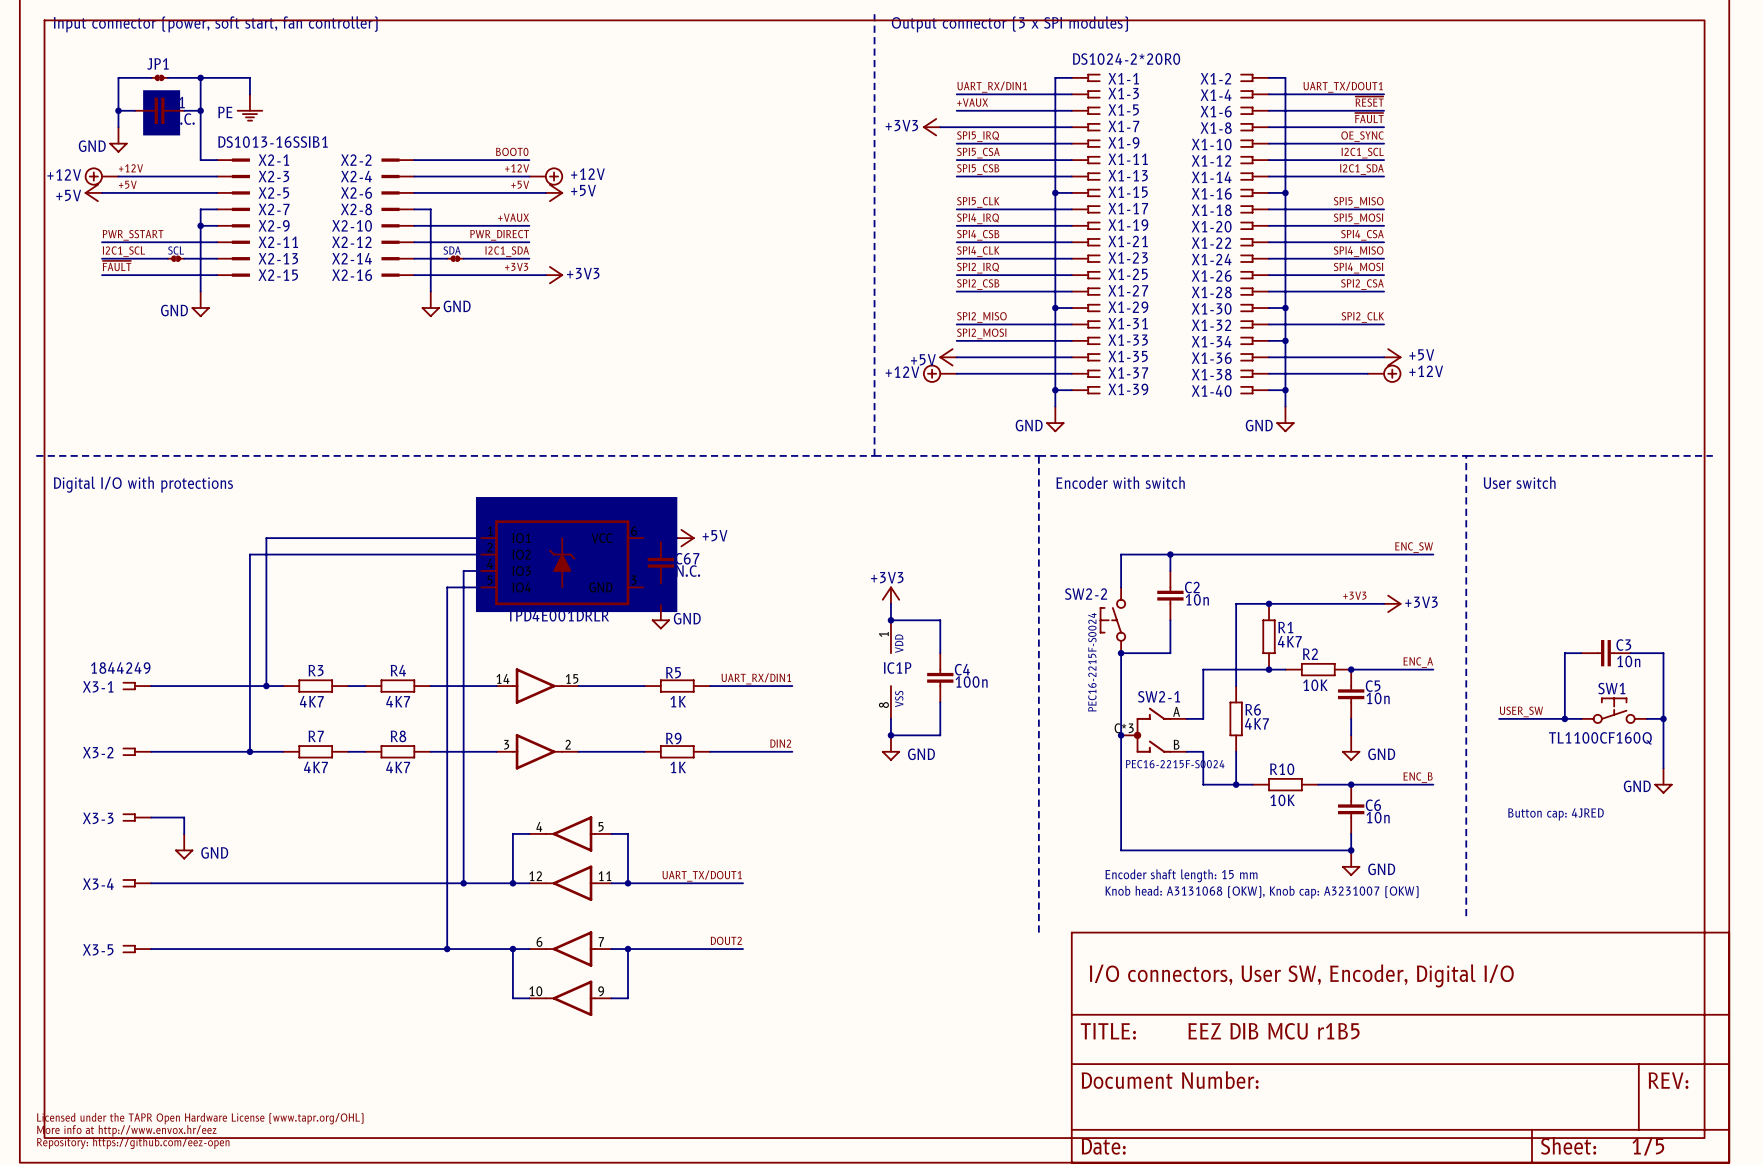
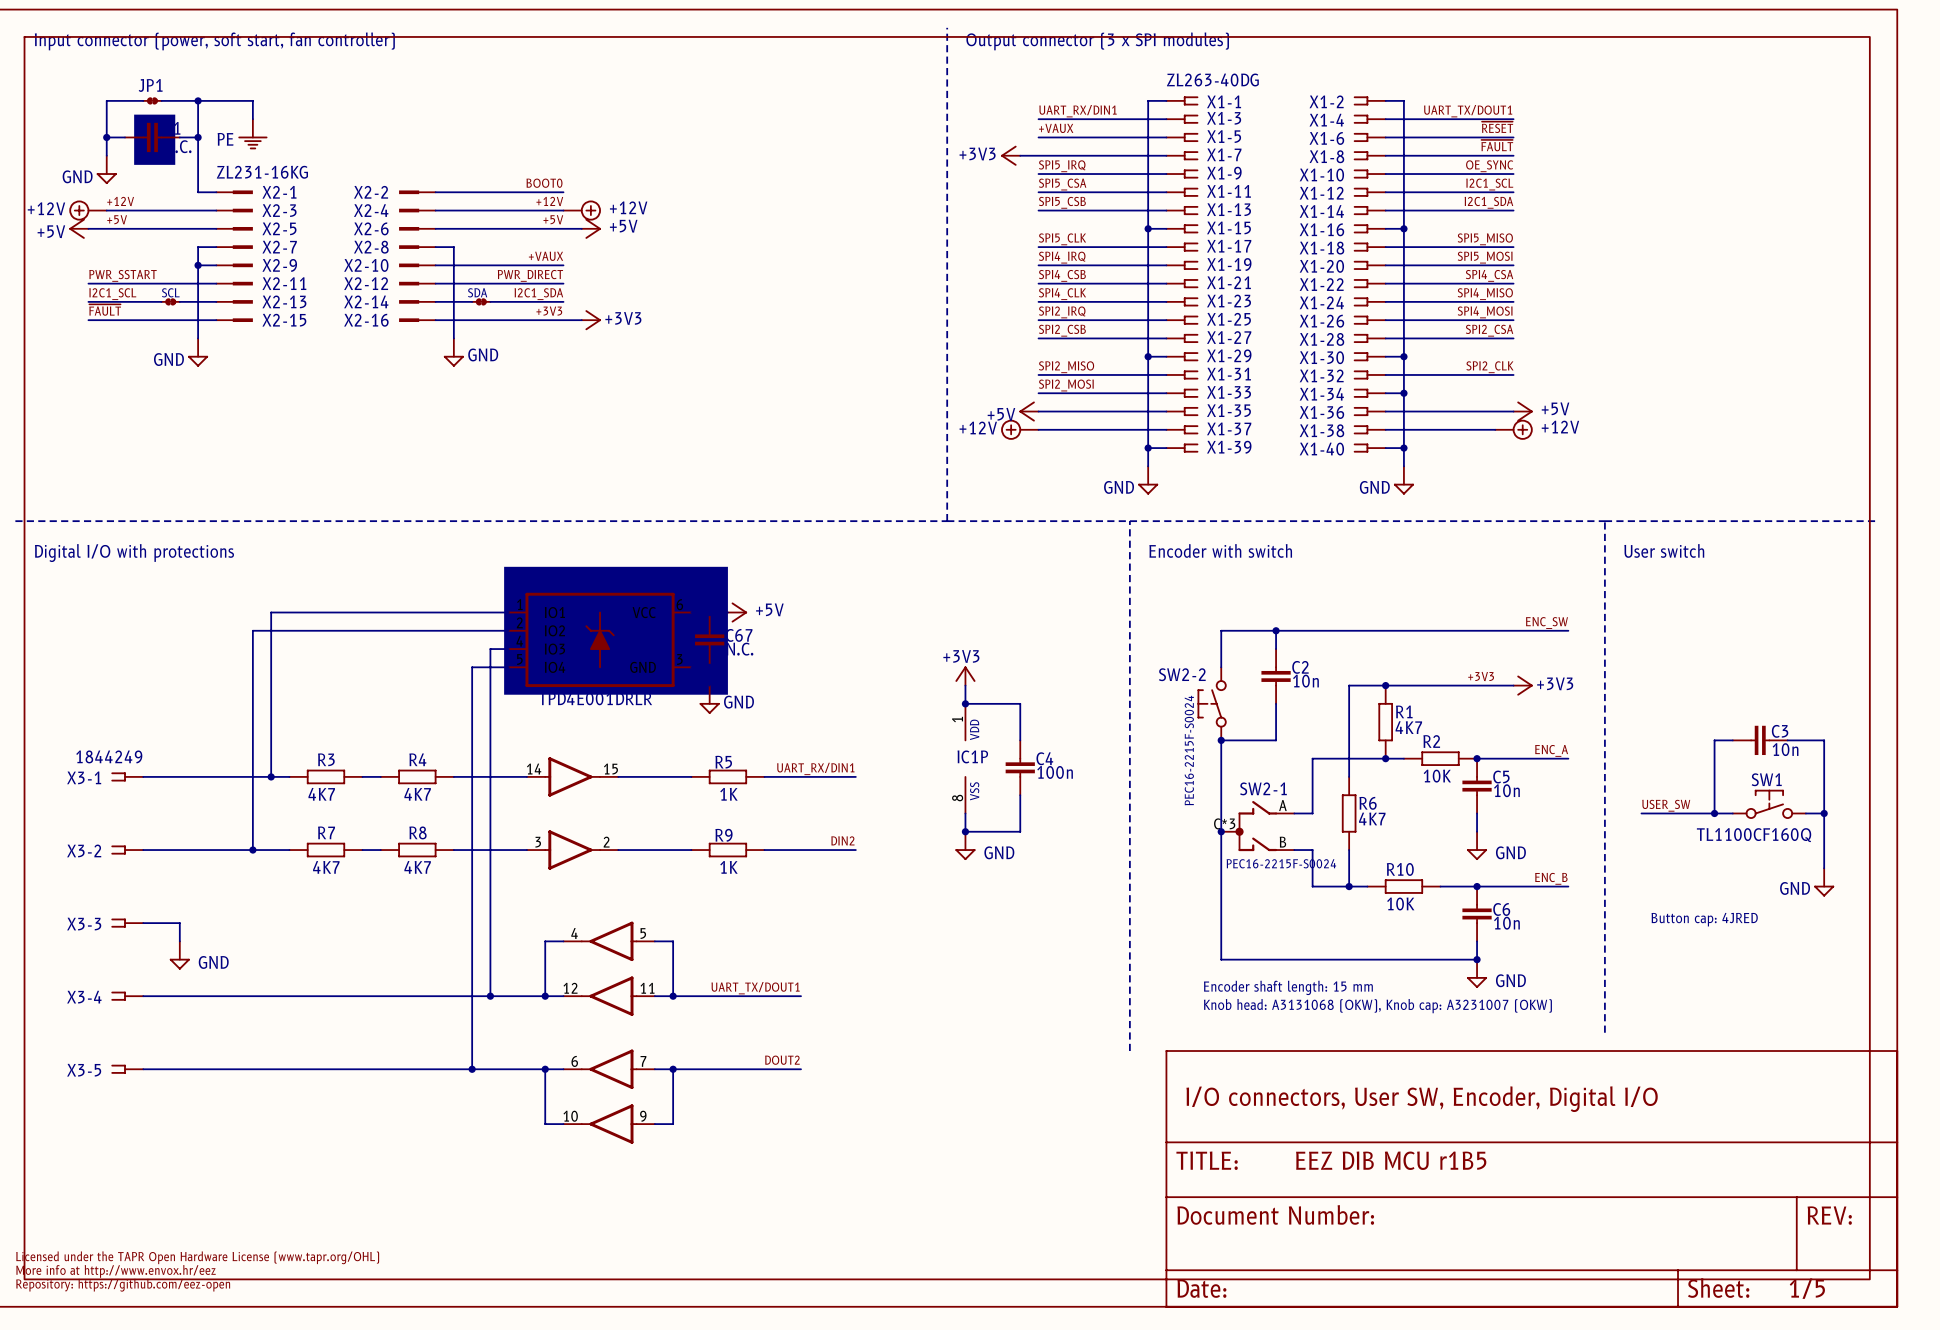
X1-1 value: DS1024-2*20R0 (1126, 59) -> ZL263-40DG (1212, 79)
X2-1 value: DS1013-16SSIB1 (273, 142) -> ZL231-16KG (262, 172)

